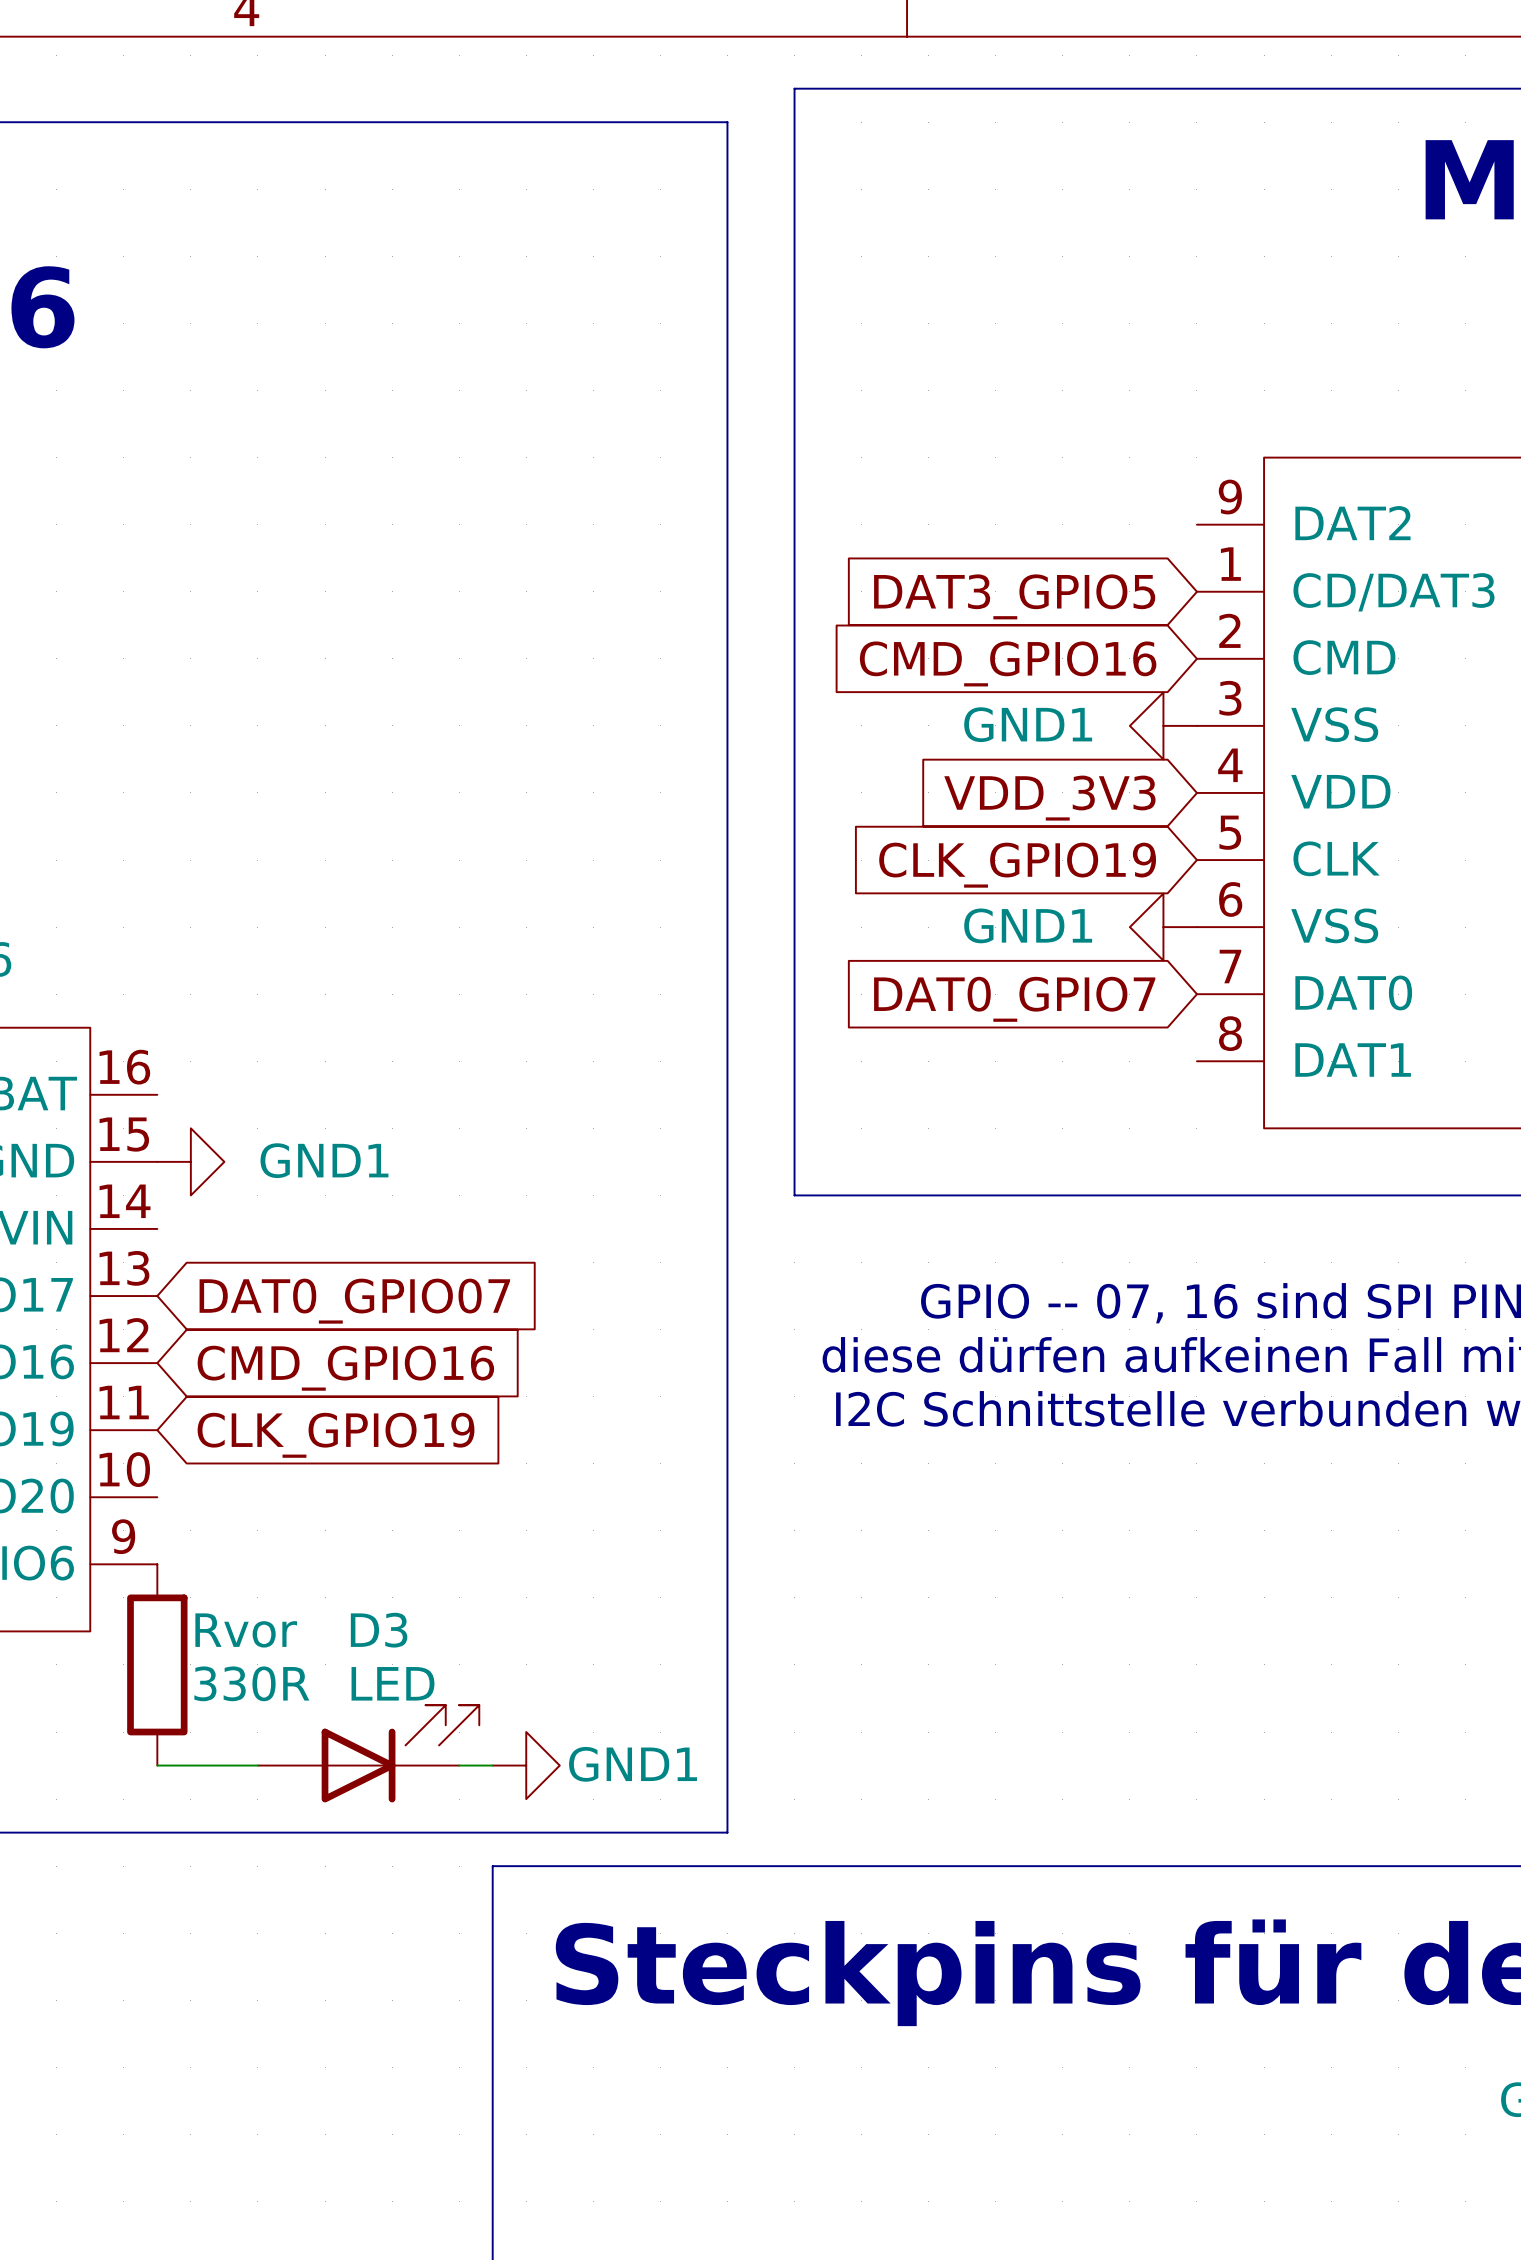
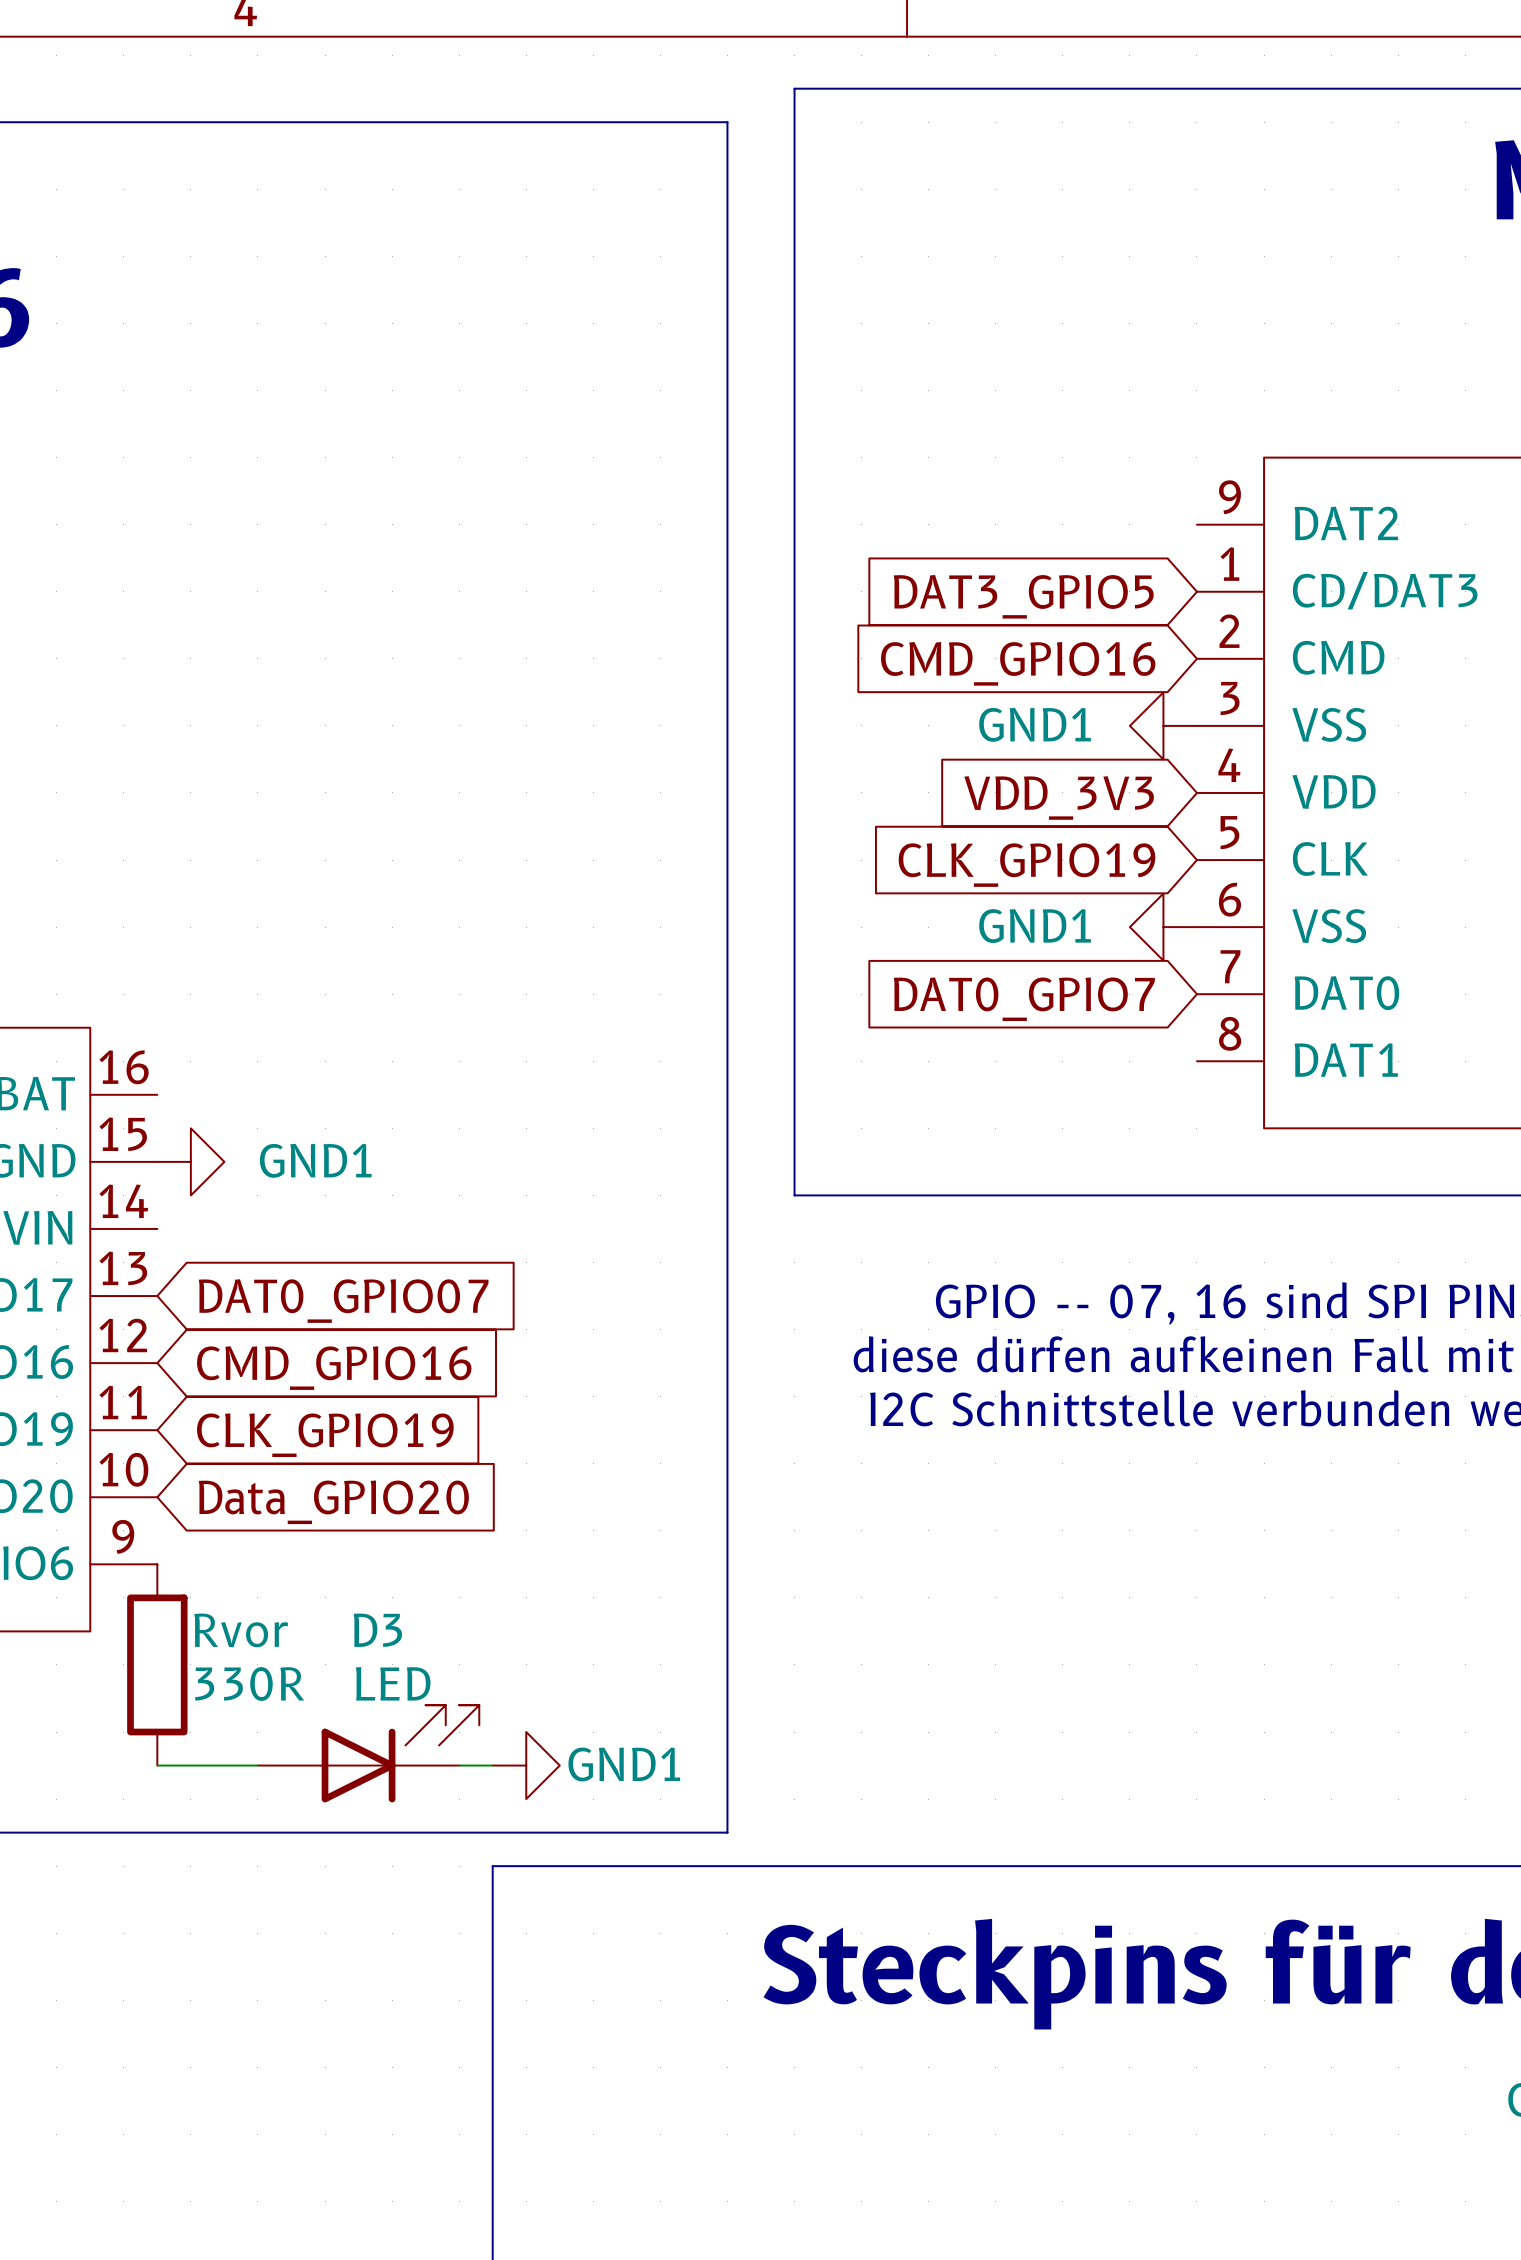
global label: none -> Data_GPIO20 (333, 1502)

